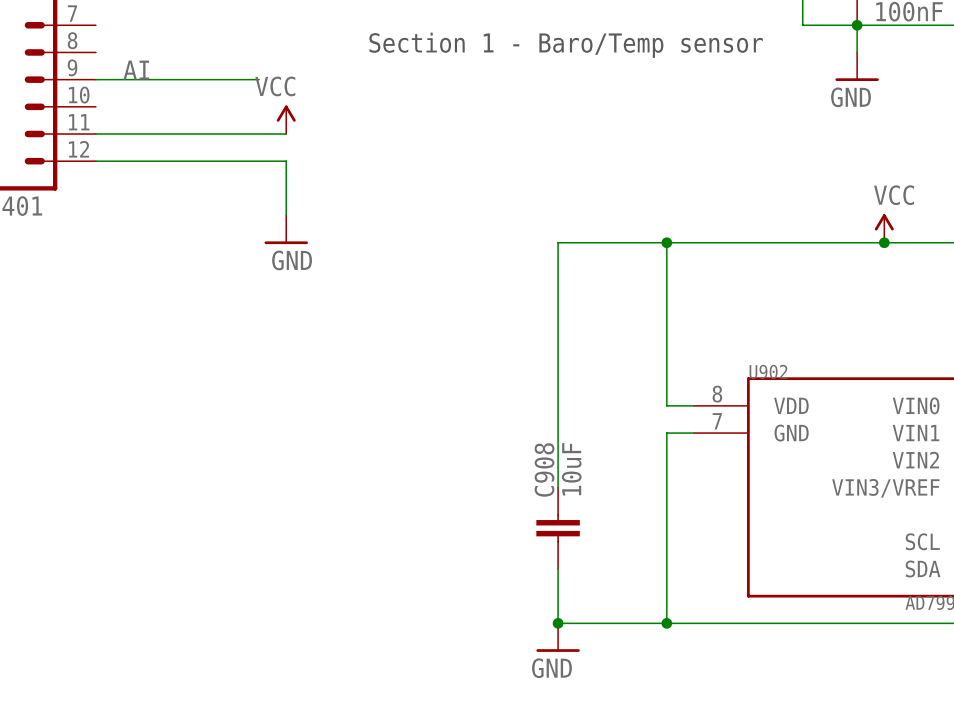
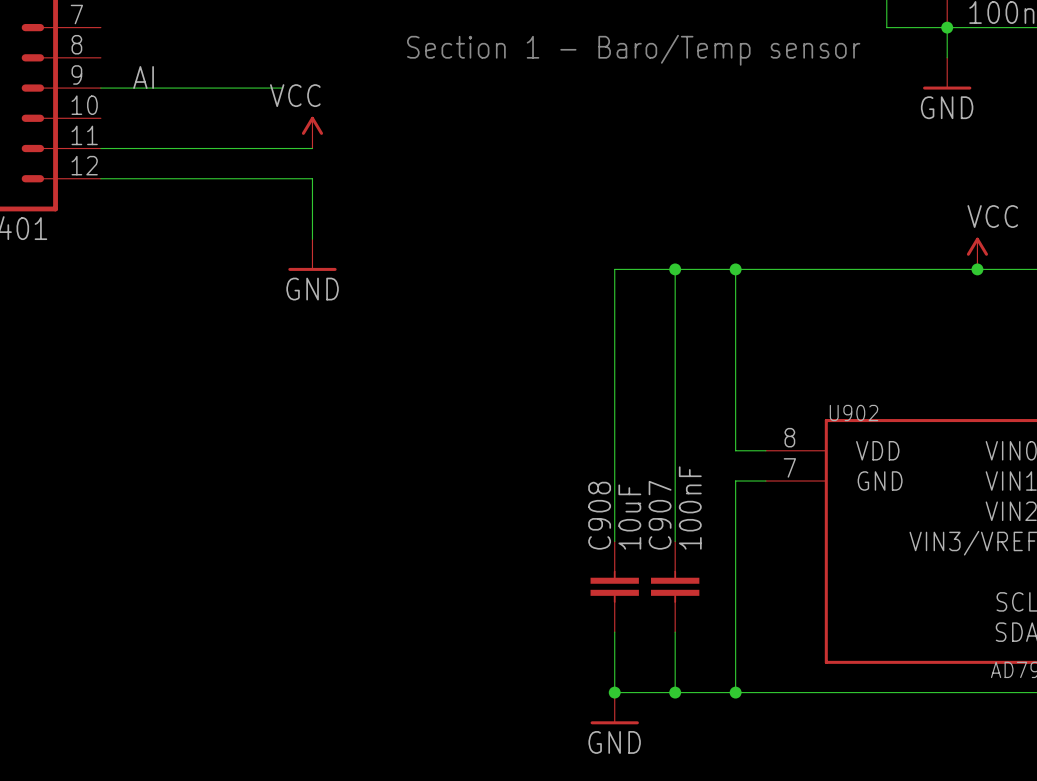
wire: none -> (675, 269) (675, 541)
junction: none -> (675, 269)
C907: none -> 100nF (675, 586)
wire: none -> (675, 632) (675, 692)
junction: none -> (675, 692)

